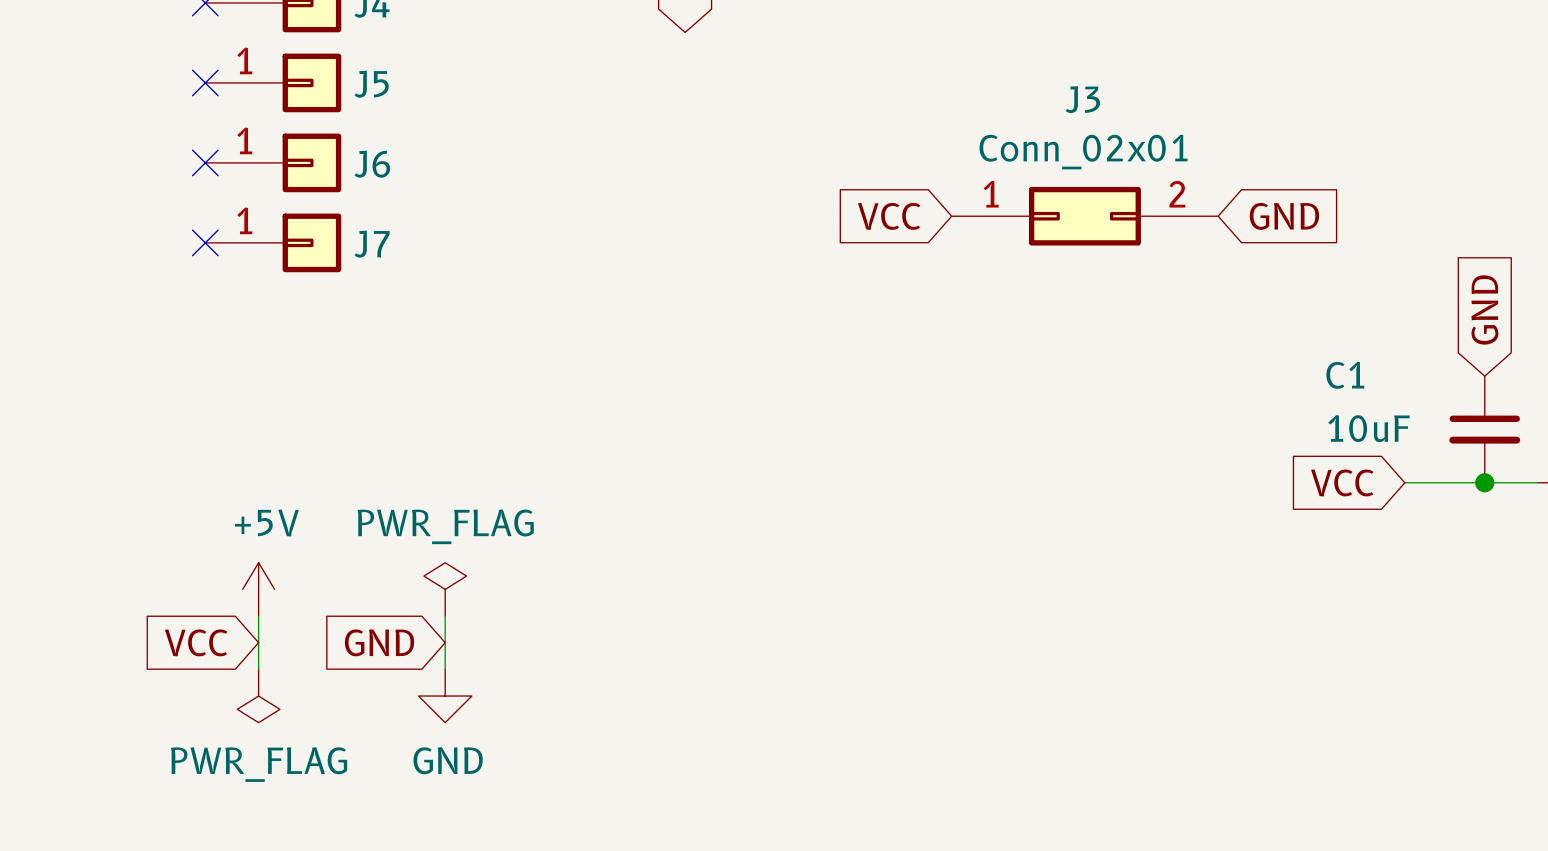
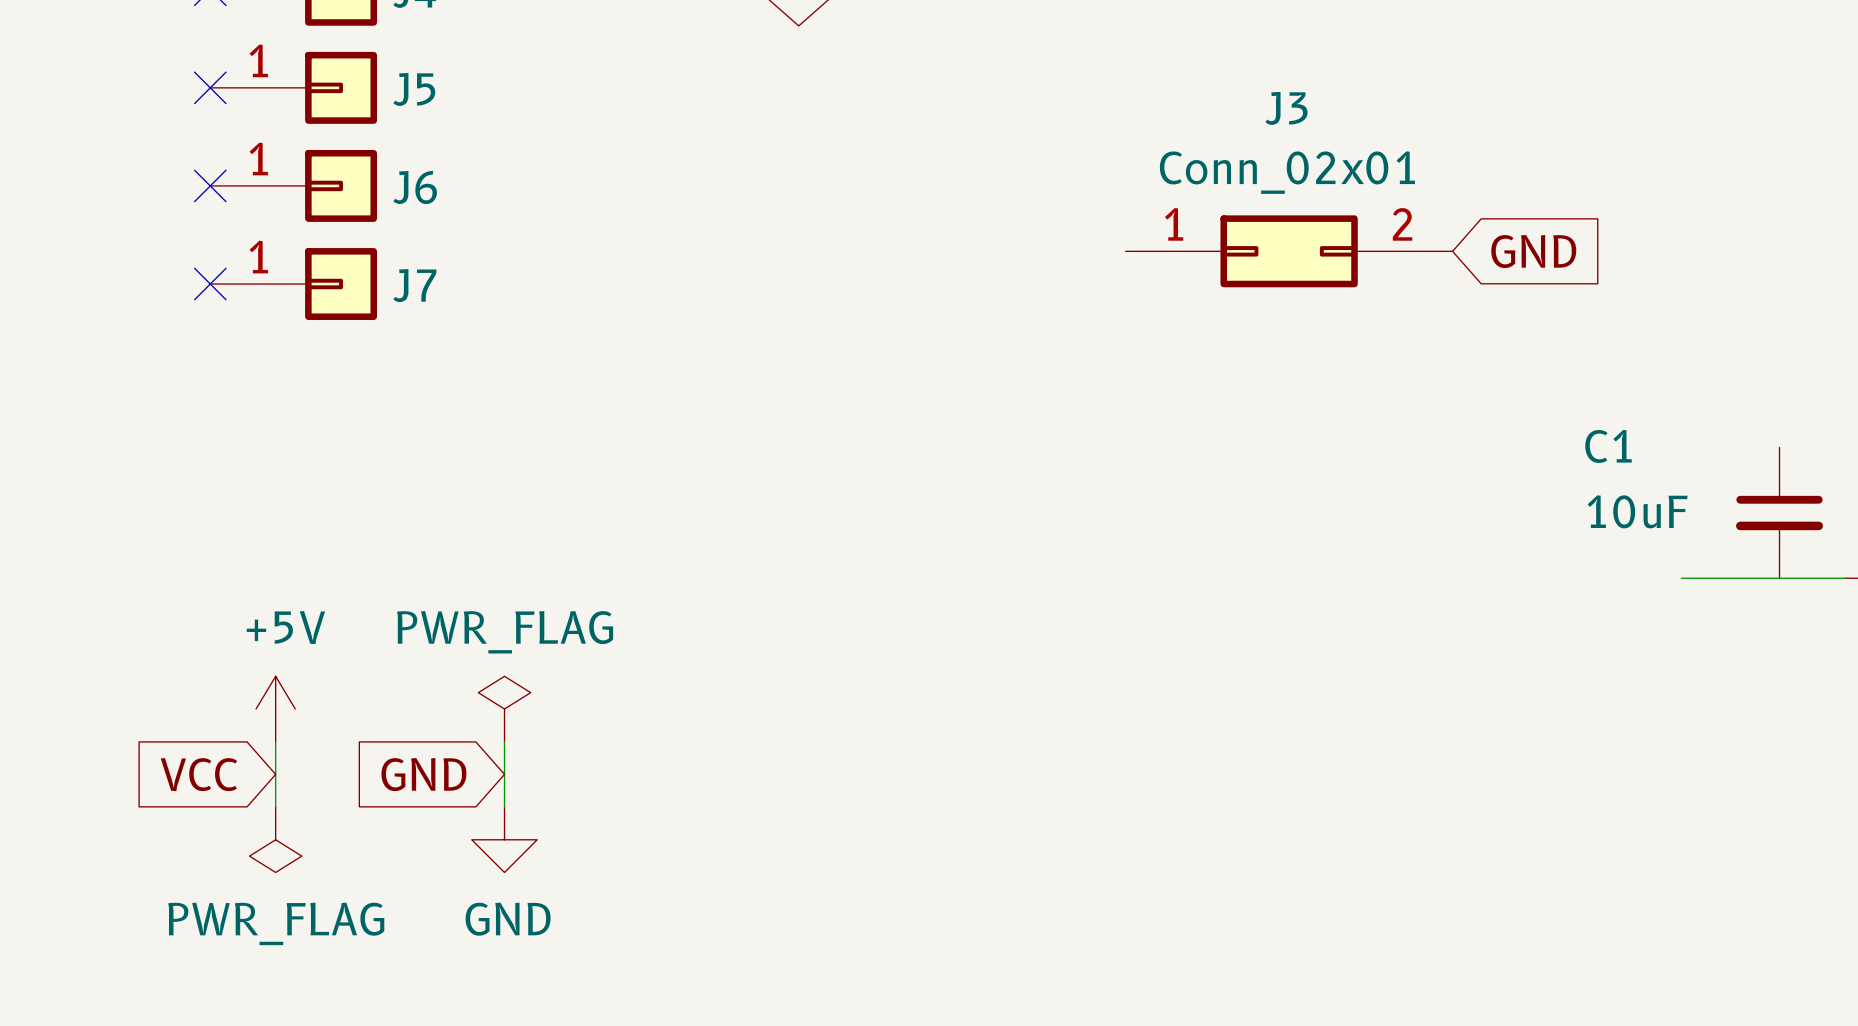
global label: VCC (889, 216) -> none
global label: GND (1484, 309) -> none
global label: VCC (1342, 482) -> none
junction: (1484, 482) -> none

